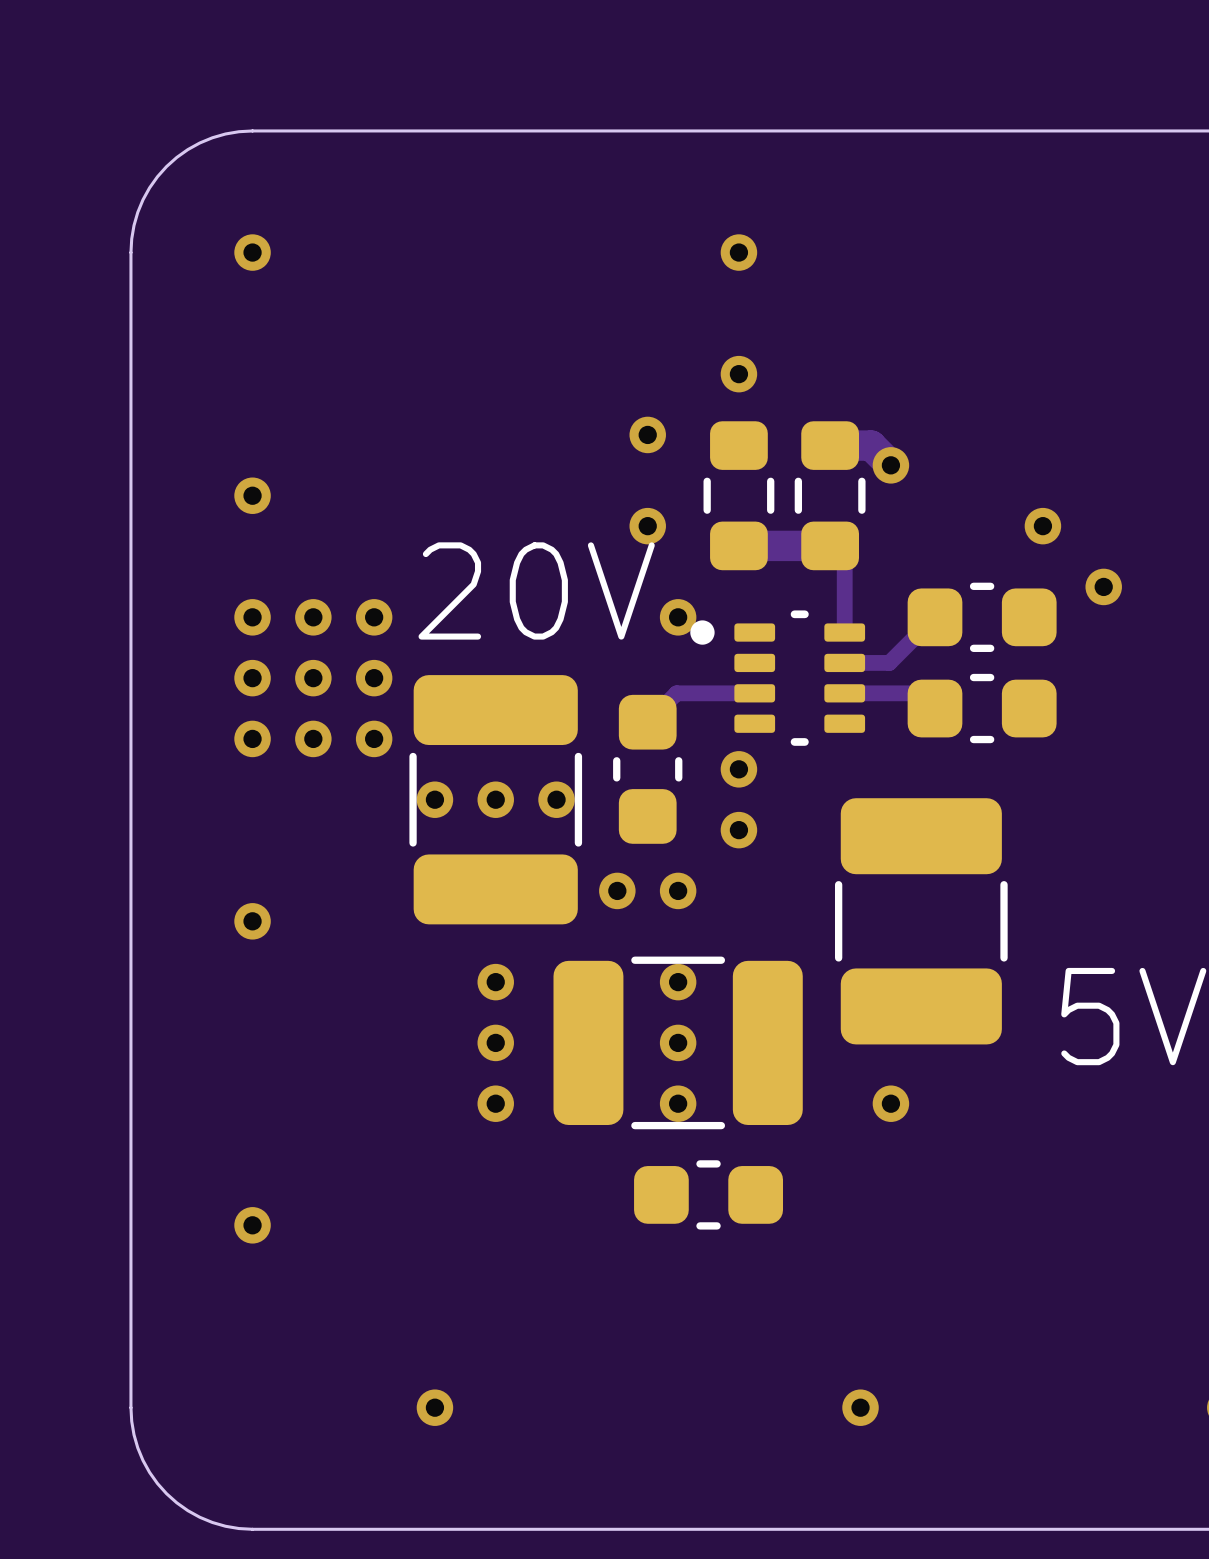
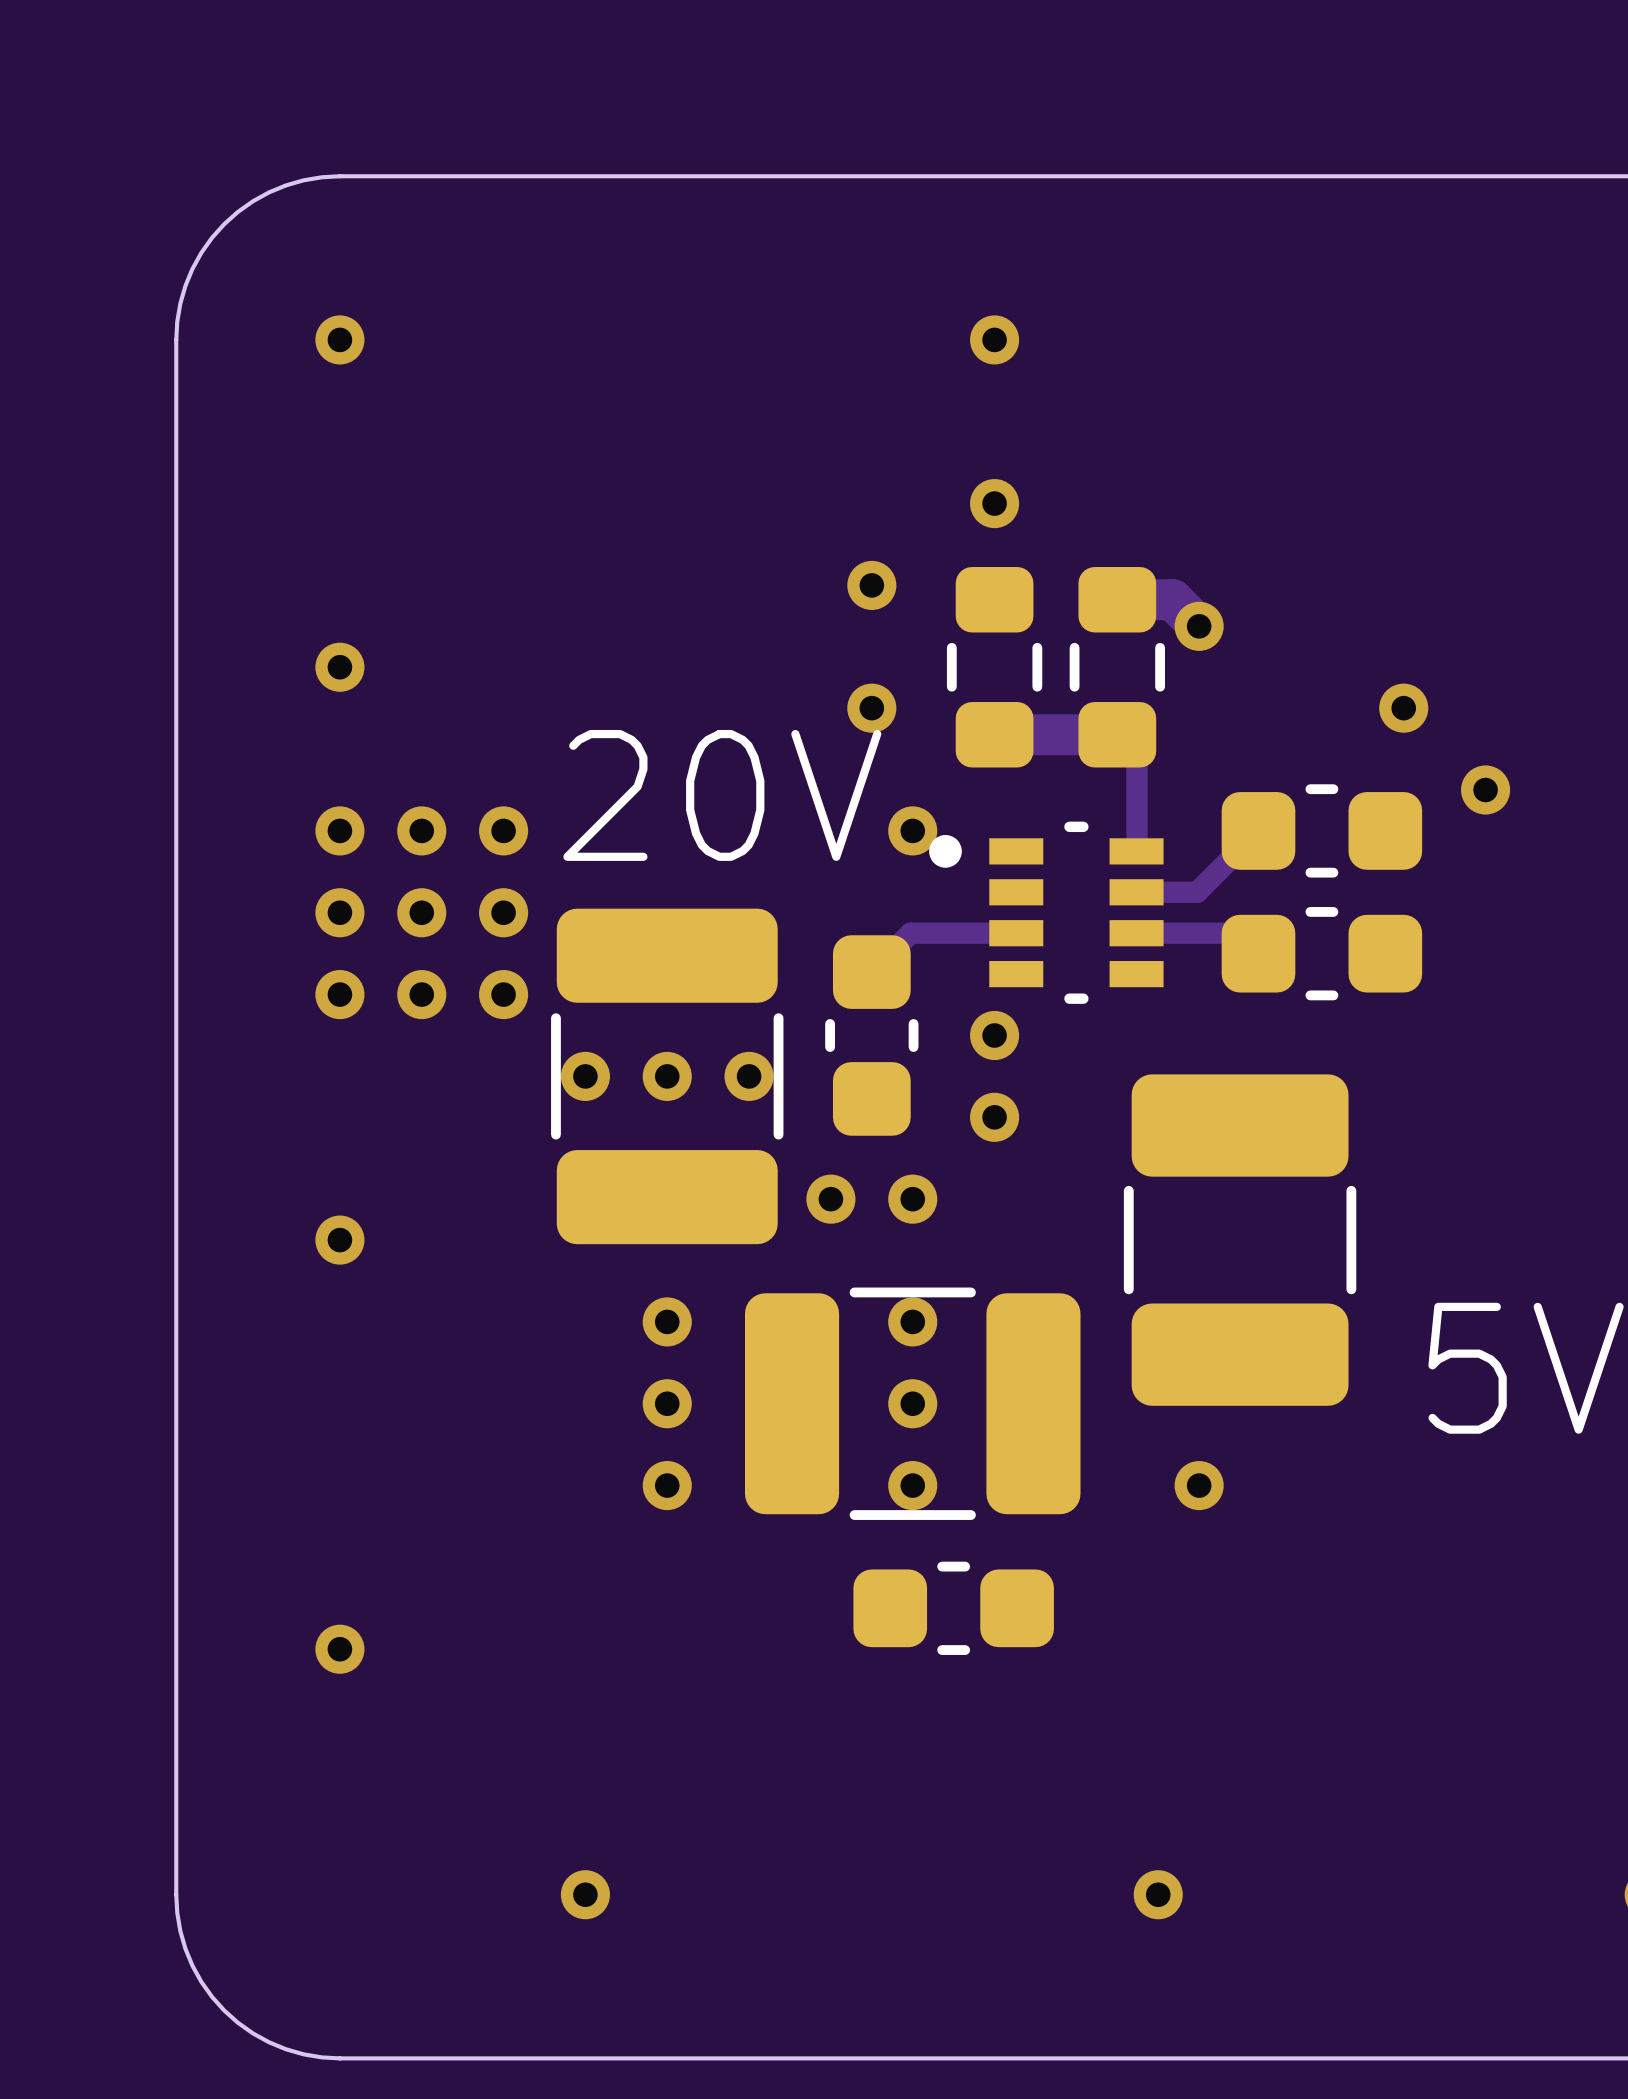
part footprint: [690, 610, 866, 746] -> [929, 821, 1164, 1004]

